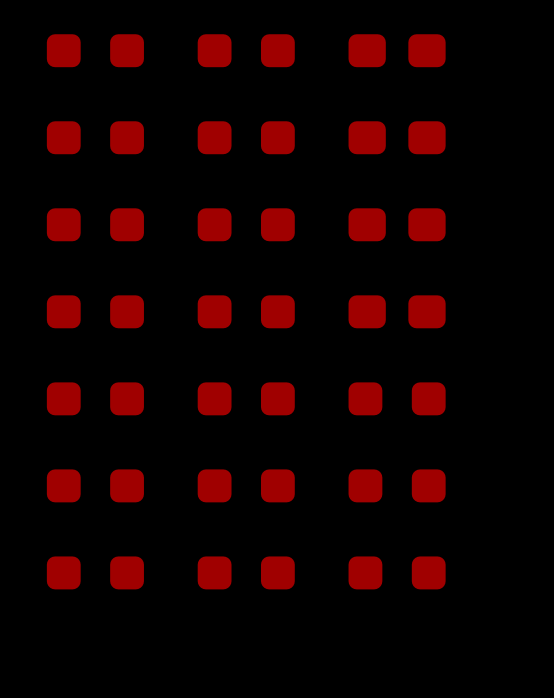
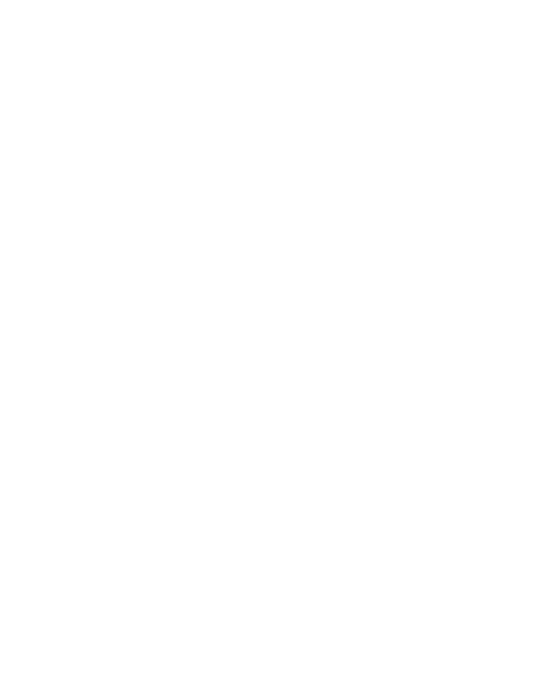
part: (95, 50) -> none
part: (246, 50) -> none
part: (397, 50) -> none
part: (95, 137) -> none
part: (246, 137) -> none
part: (397, 137) -> none
part: (95, 224) -> none
part: (246, 224) -> none
part: (397, 224) -> none
part: (95, 311) -> none
part: (246, 311) -> none
part: (397, 311) -> none
part: (95, 398) -> none
part: (246, 398) -> none
part: (397, 398) -> none
part: (95, 485) -> none
part: (246, 485) -> none
part: (397, 485) -> none
part: (95, 572) -> none
part: (246, 572) -> none
part: (397, 572) -> none

